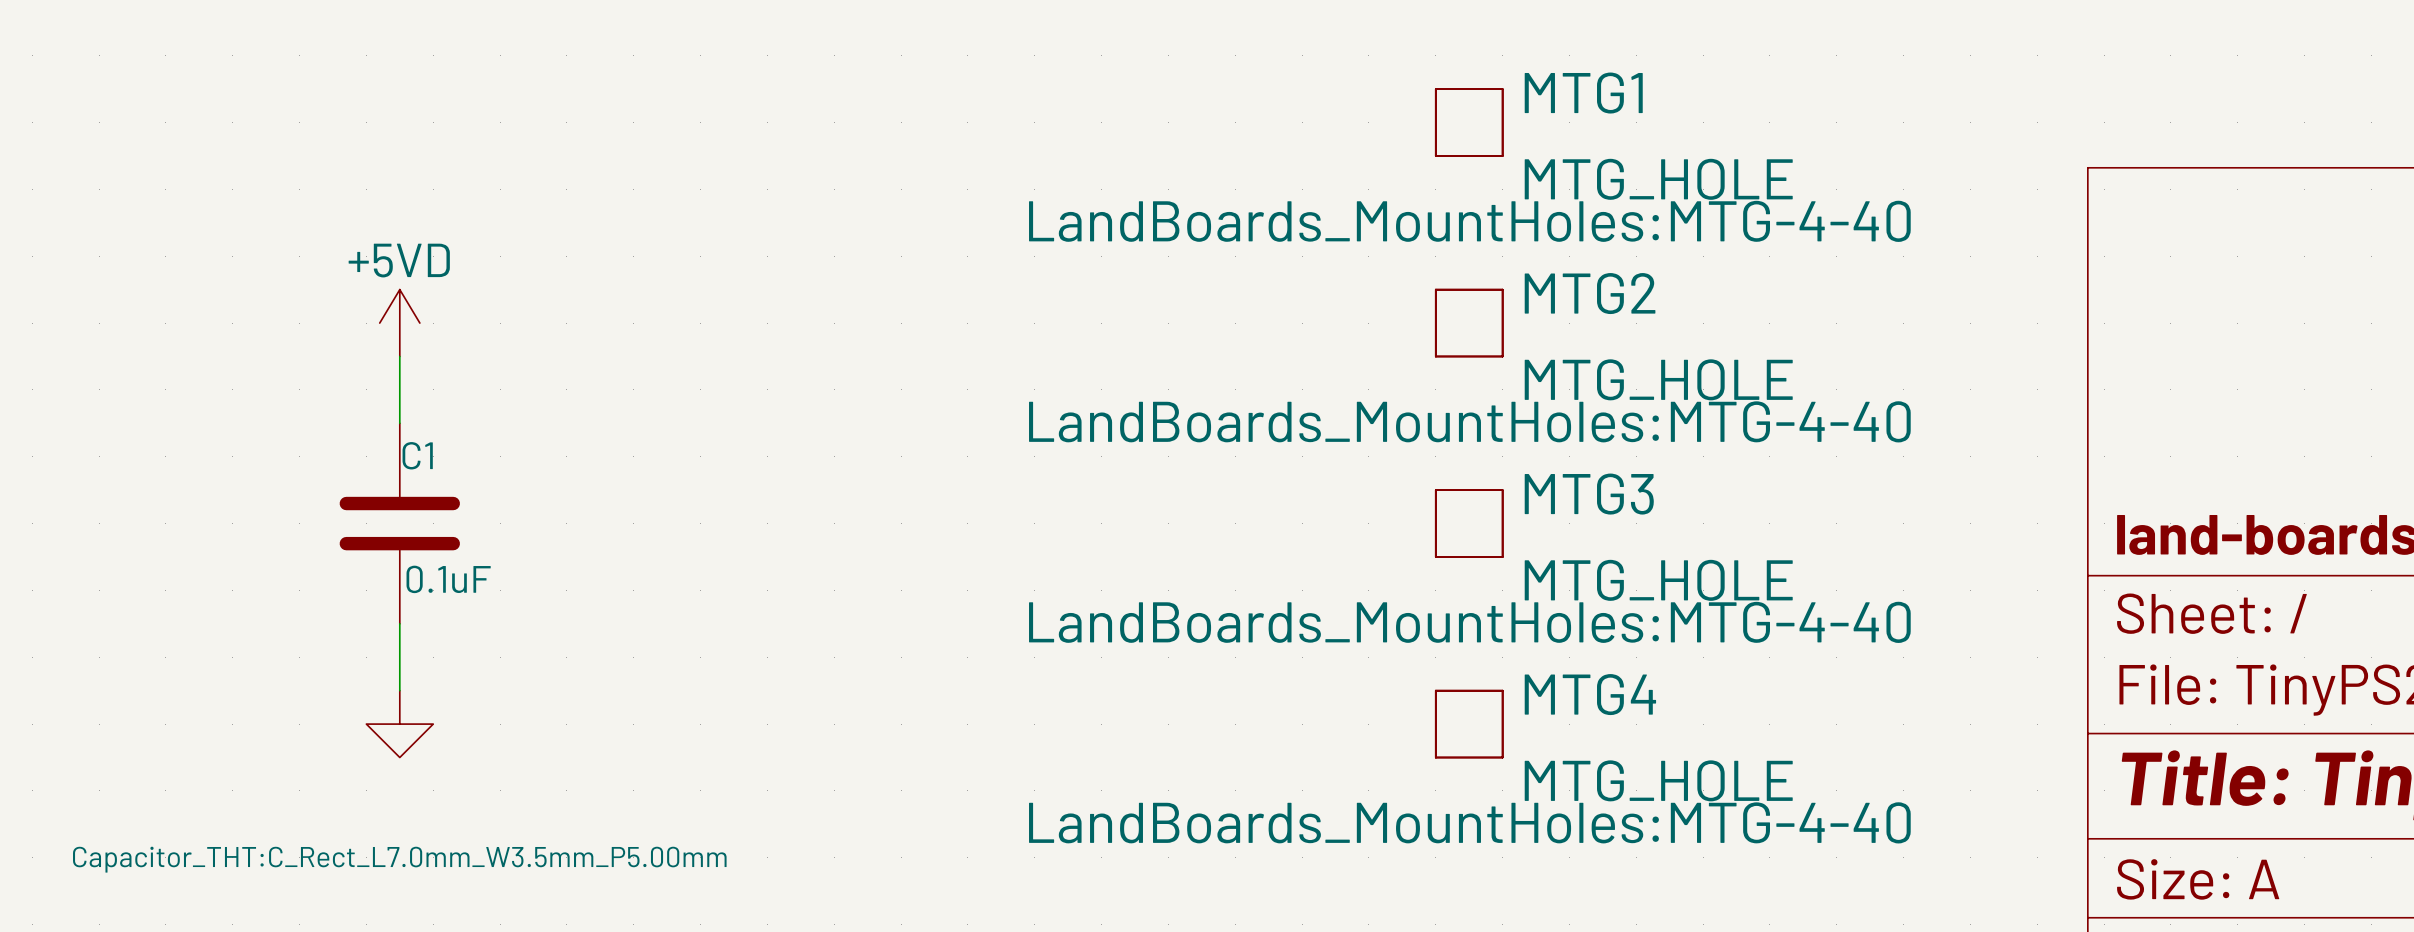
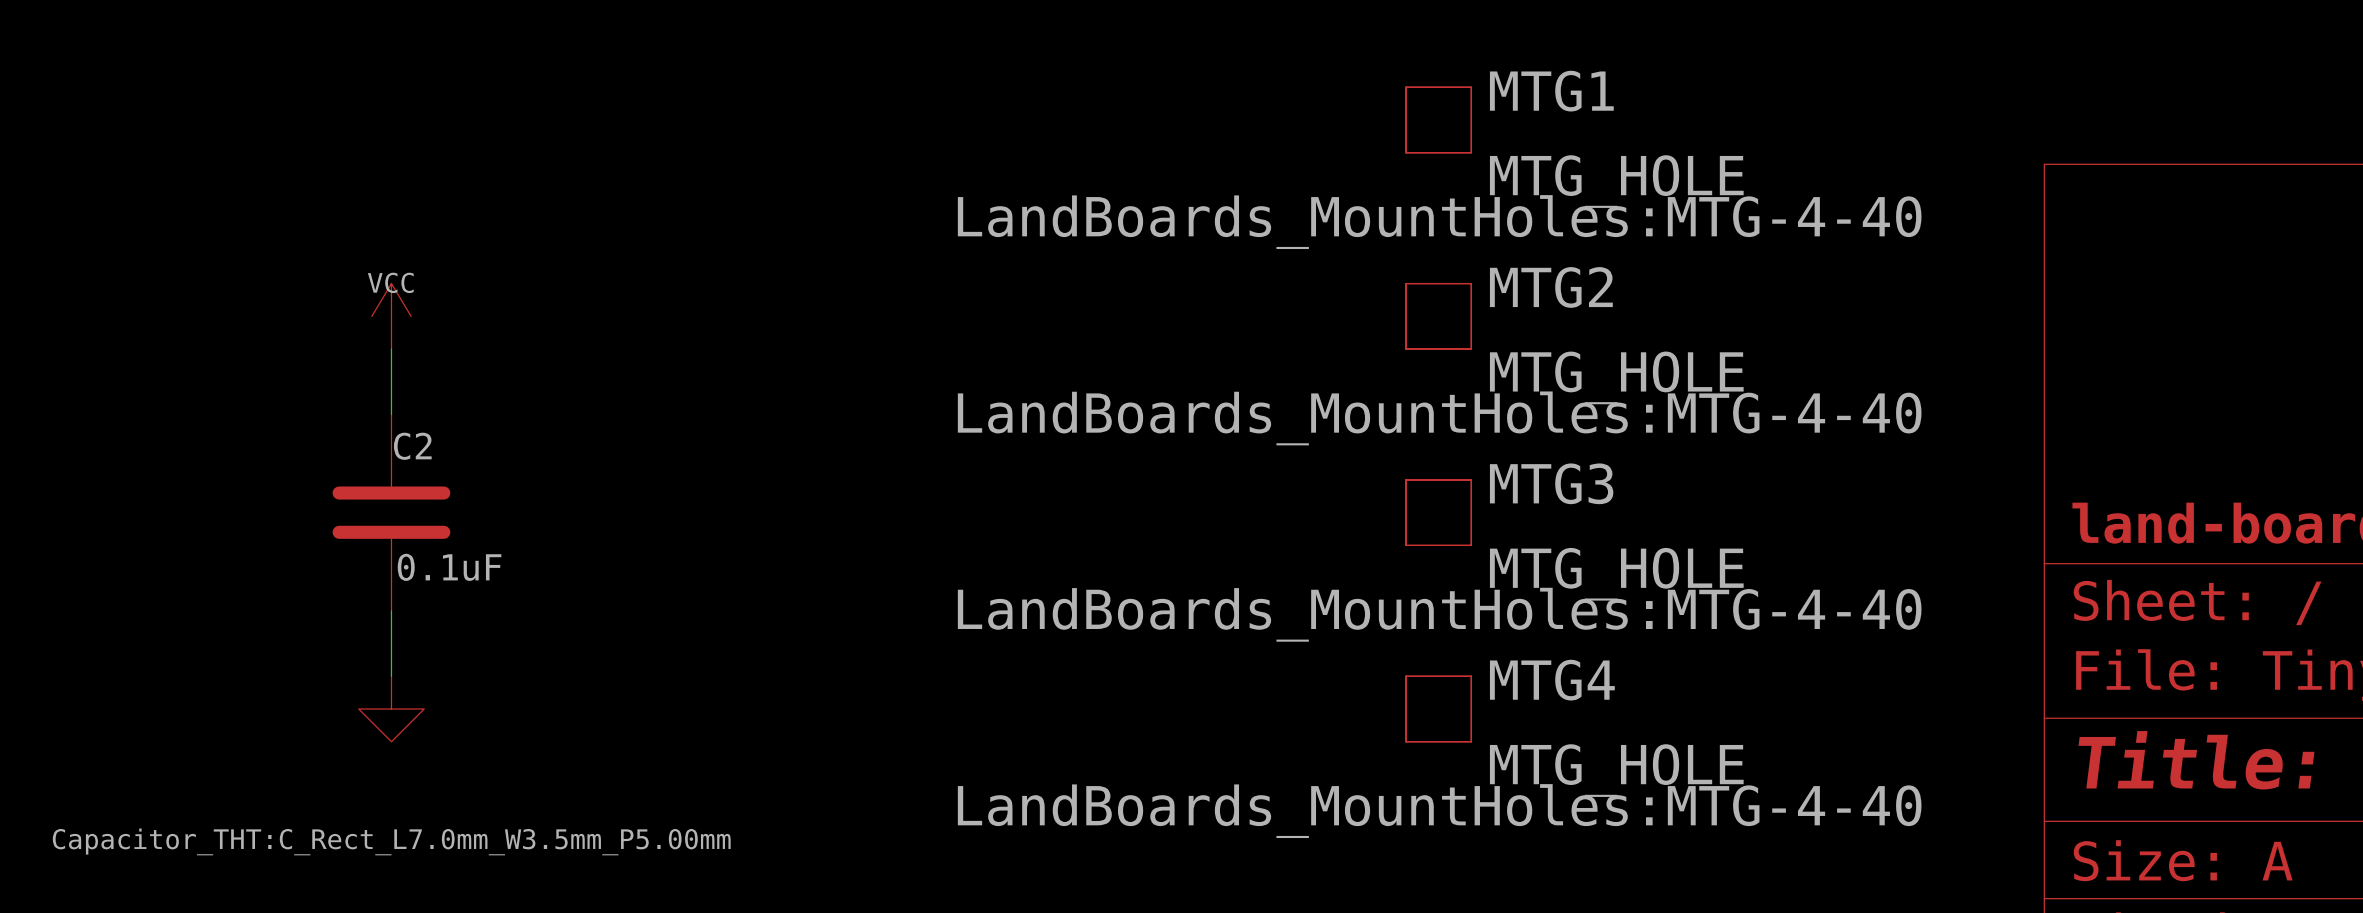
power symbol: +5VD (399, 323) -> VCC (391, 316)
C1 name: C1 (417, 455) -> C2 (412, 446)

